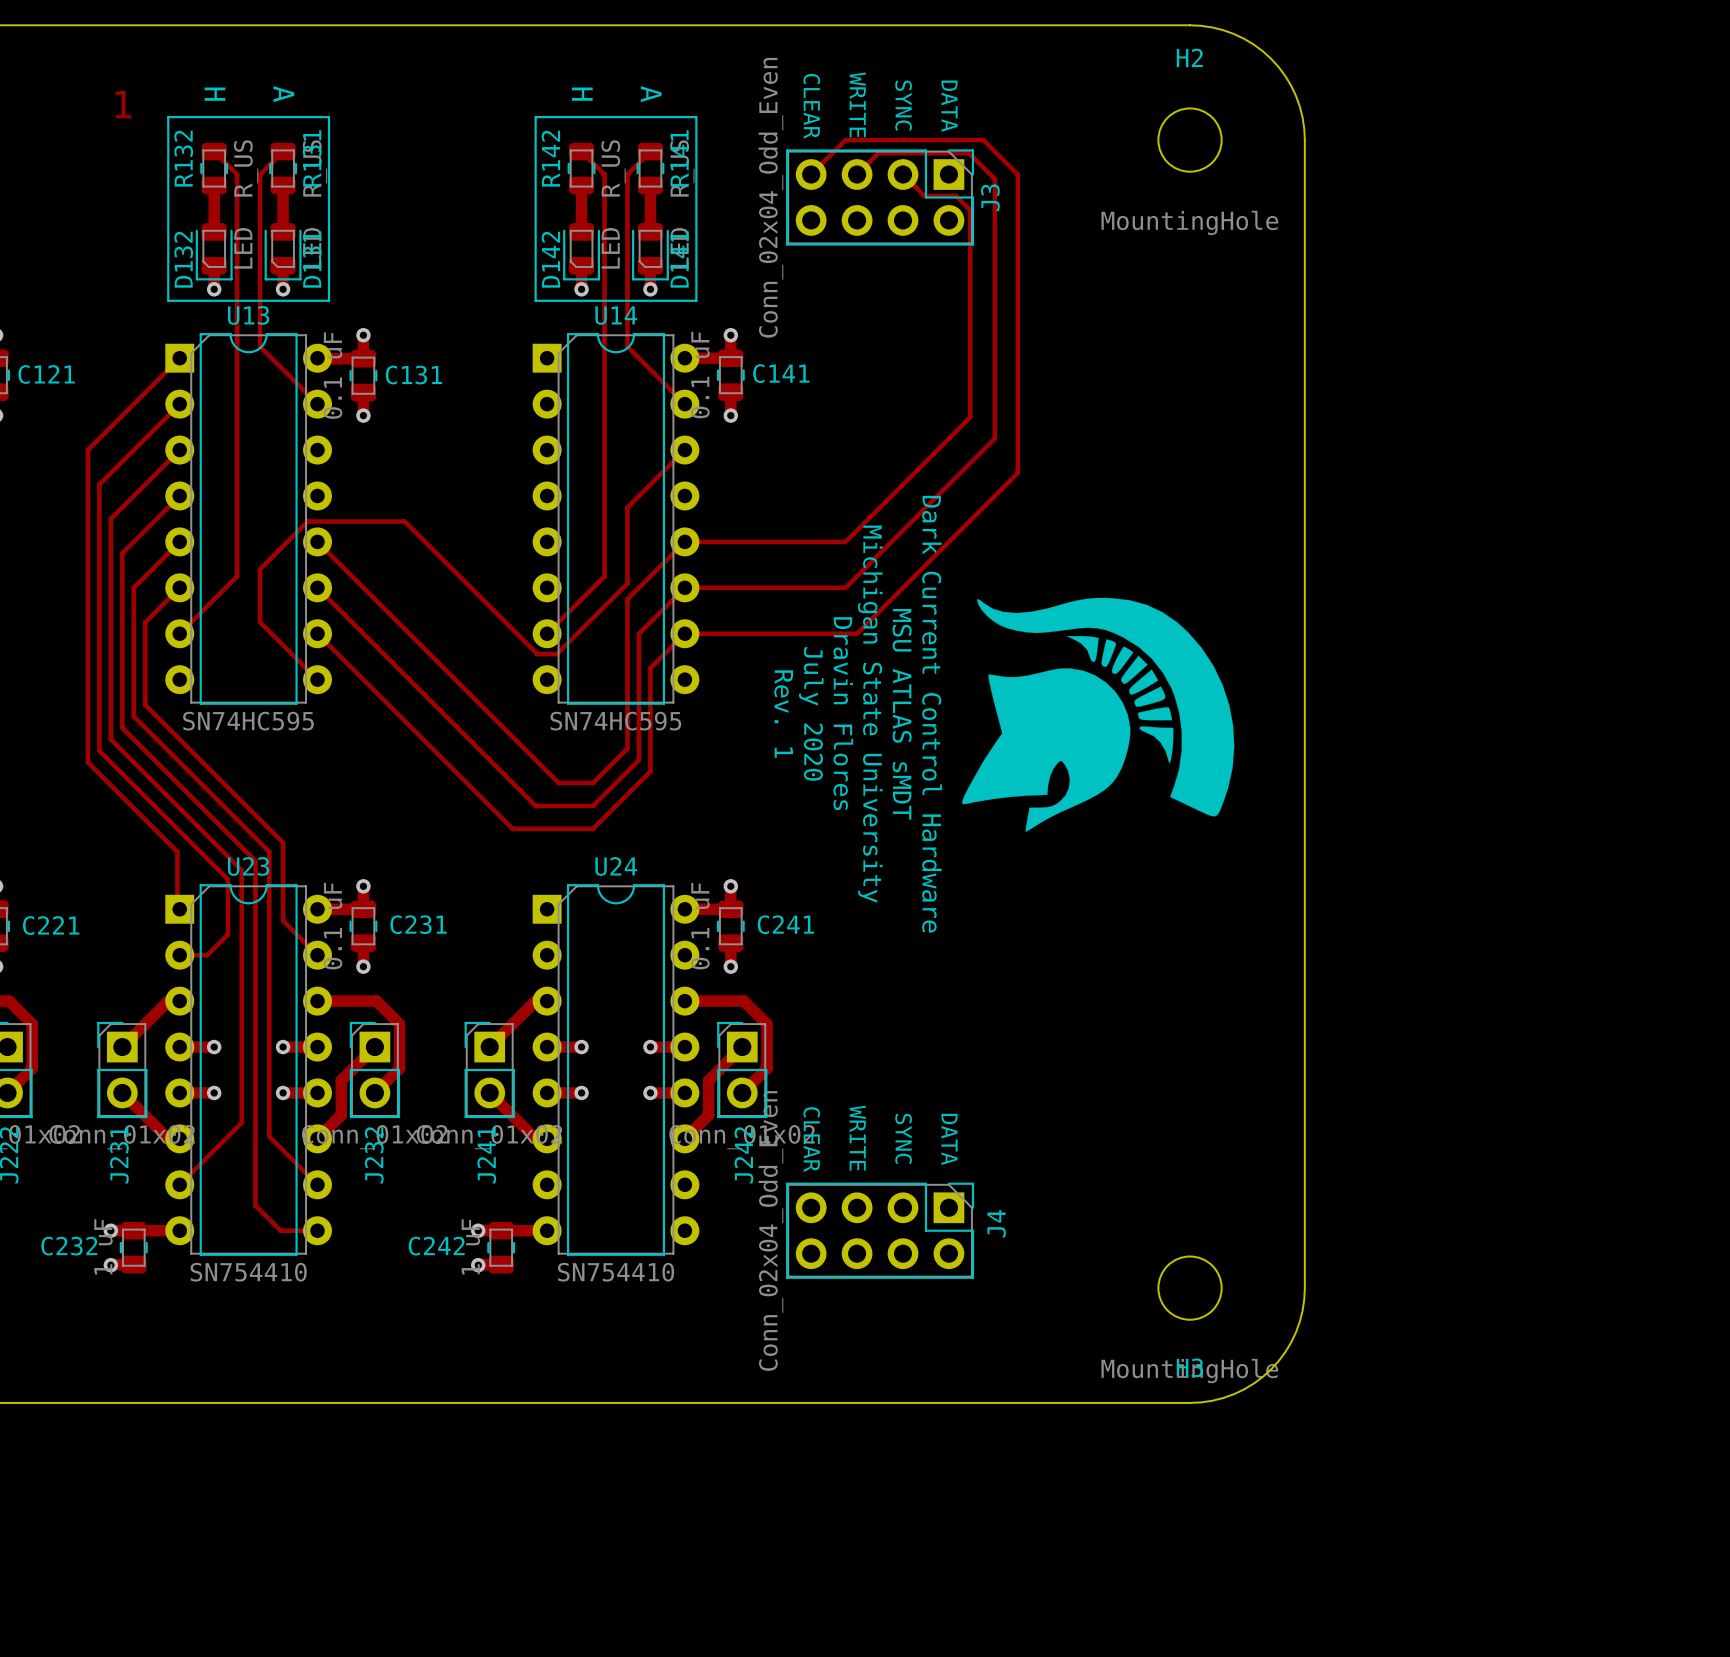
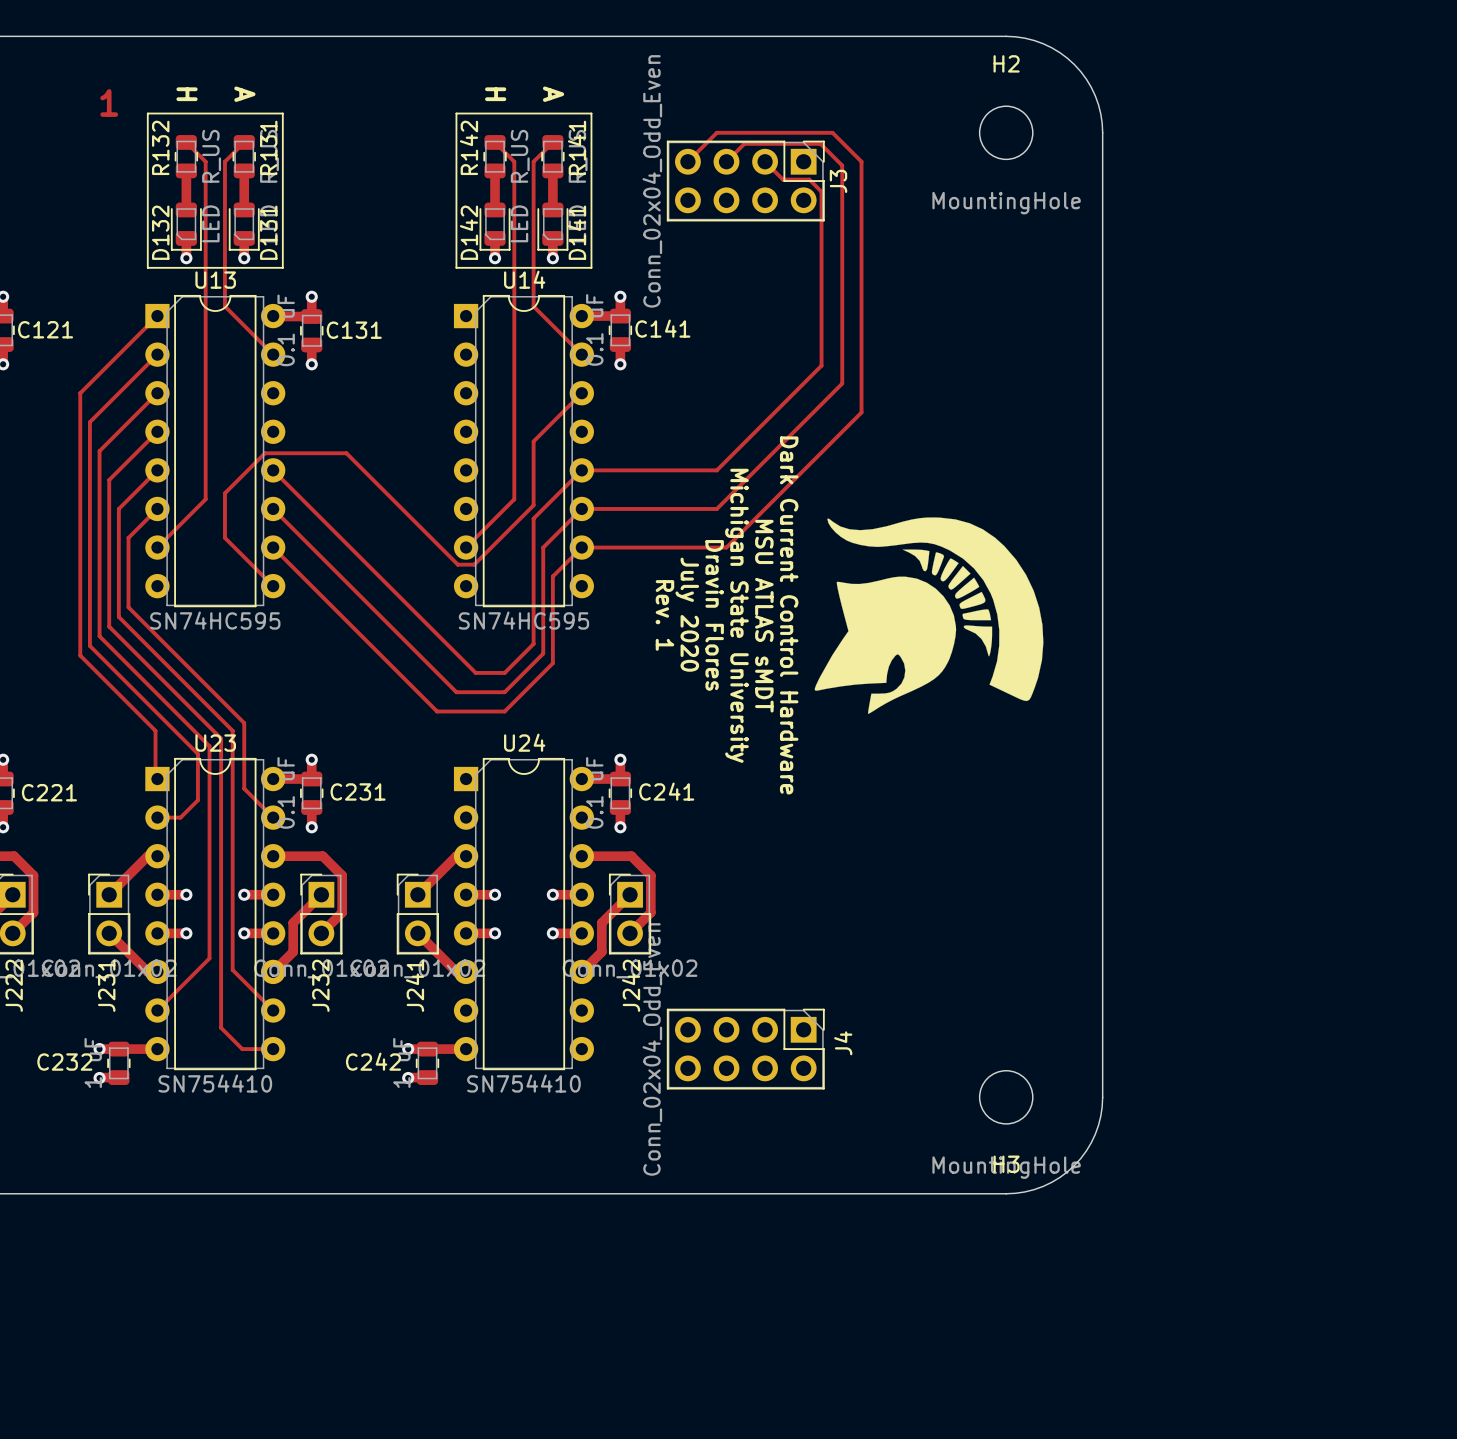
text: WRITE (857, 104) -> none
text: SYNC (903, 105) -> none
text: CLEAR (811, 106) -> none
text: DATA (949, 106) -> none
text: WRITE (857, 1138) -> none
text: SYNC (903, 1138) -> none
text: CLEAR (811, 1139) -> none
text: DATA (949, 1139) -> none

